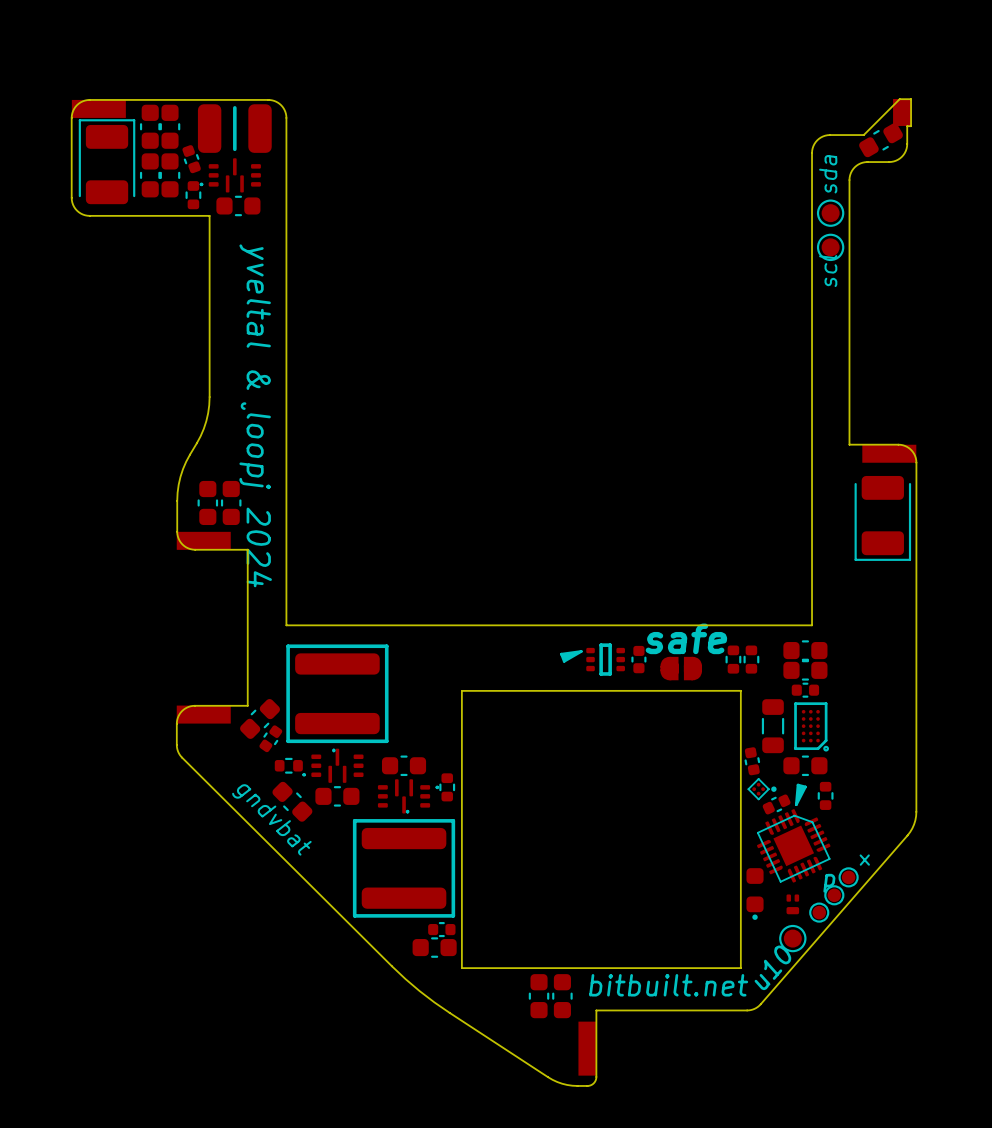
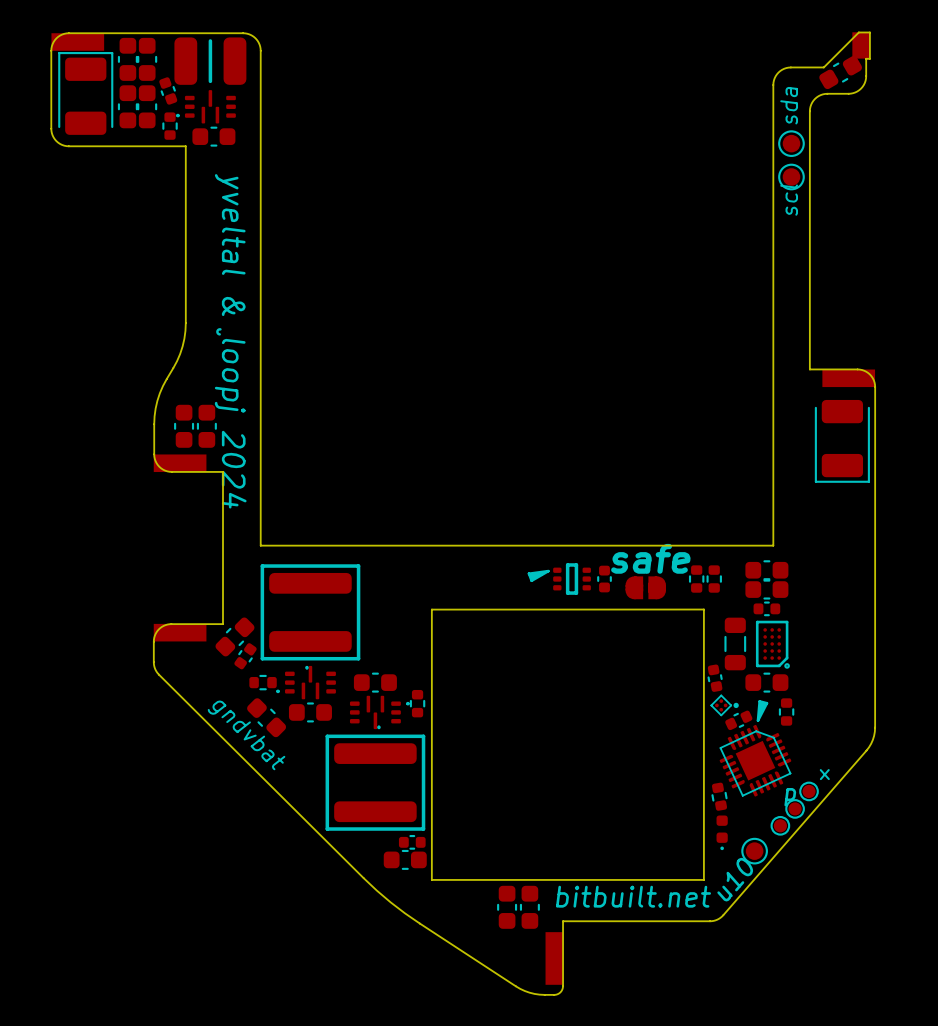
part footprint: [746, 868, 764, 920] -> [711, 782, 728, 811]
part: (792, 904) -> none
part: none -> (722, 832)

